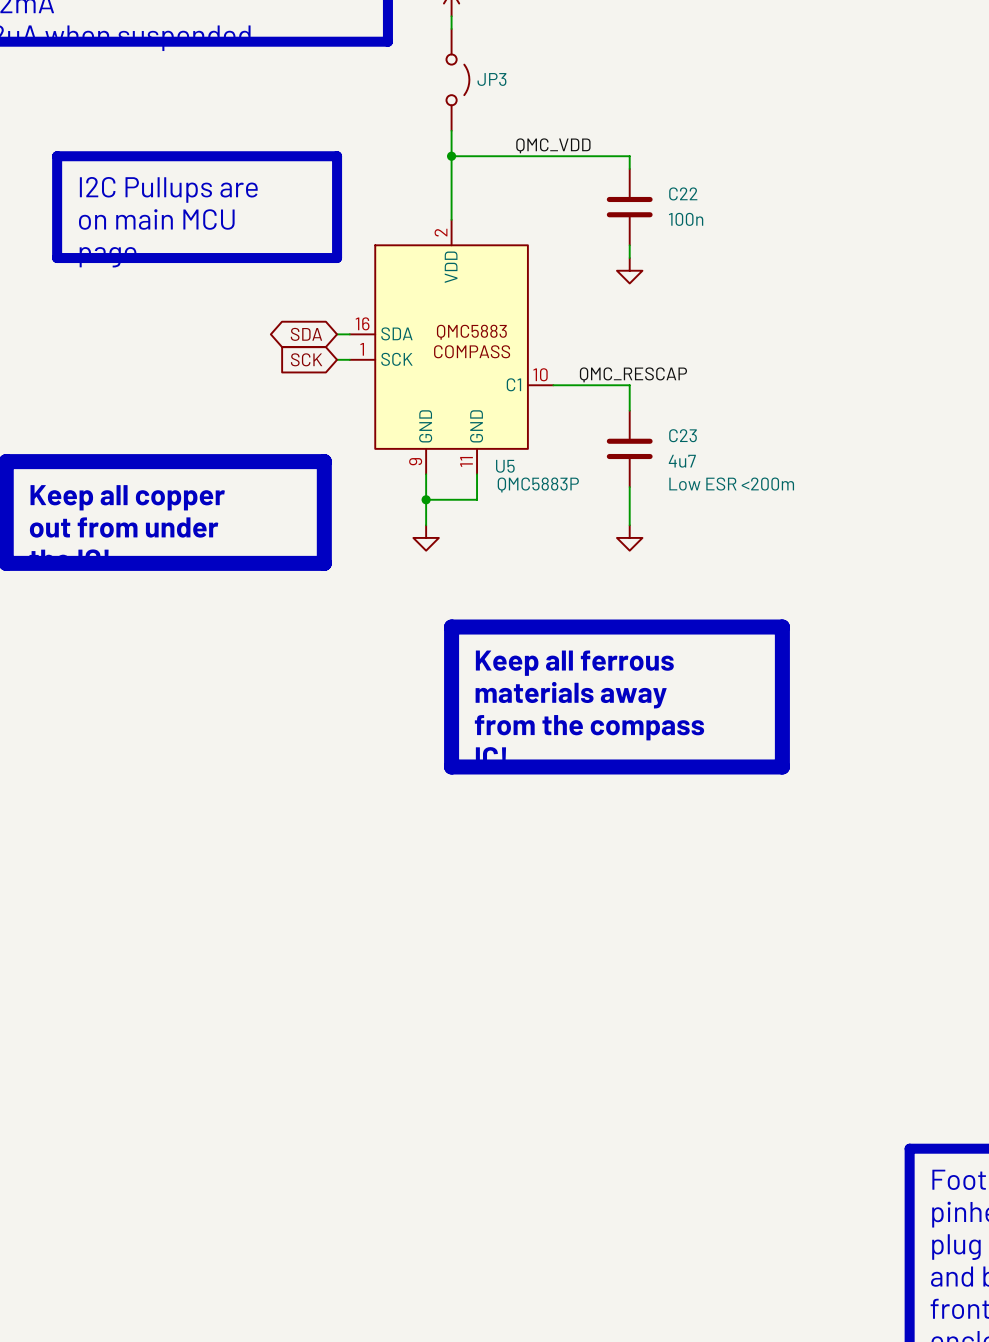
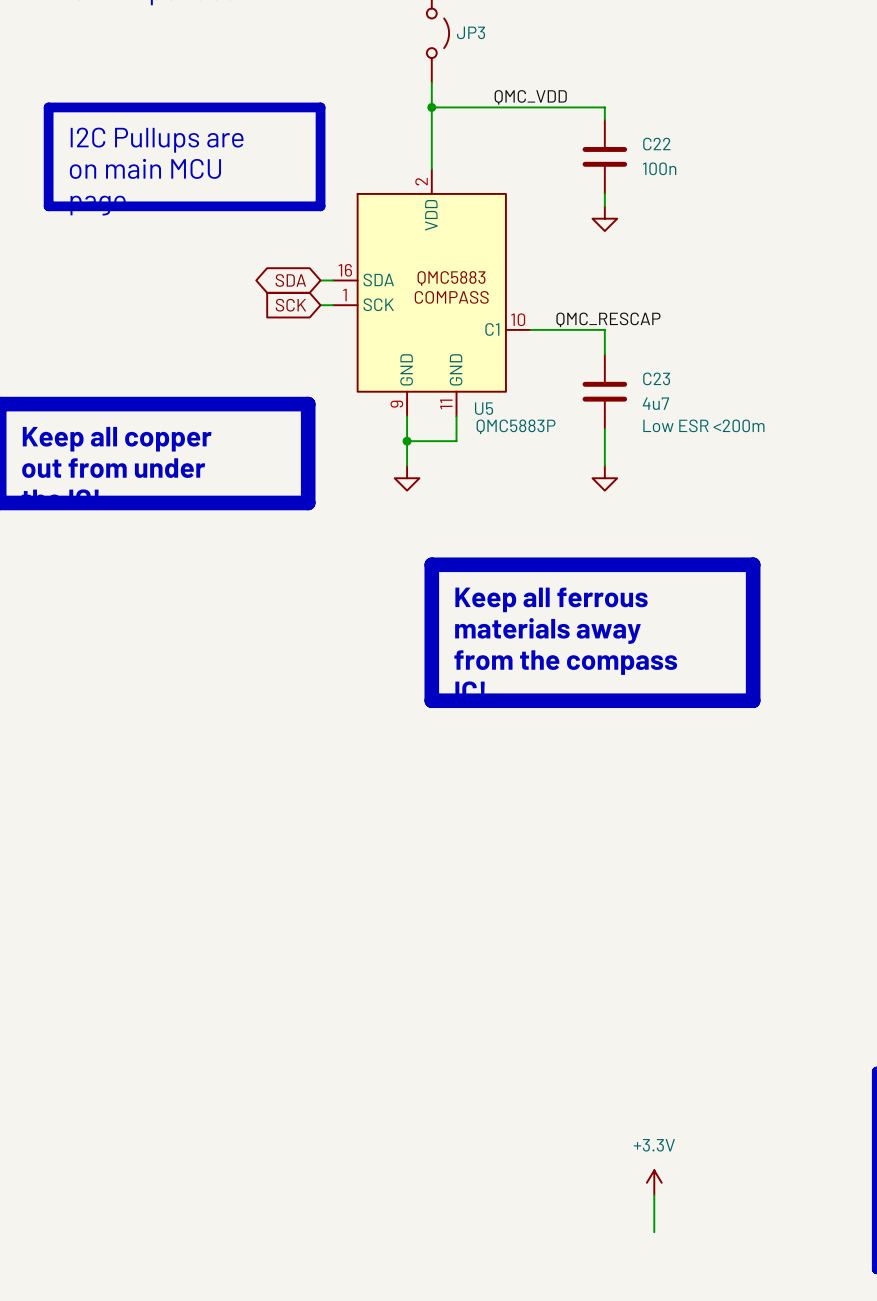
power symbol: none -> +3.3V (654, 1182)
wire: none -> (654, 1195) (654, 1232)

